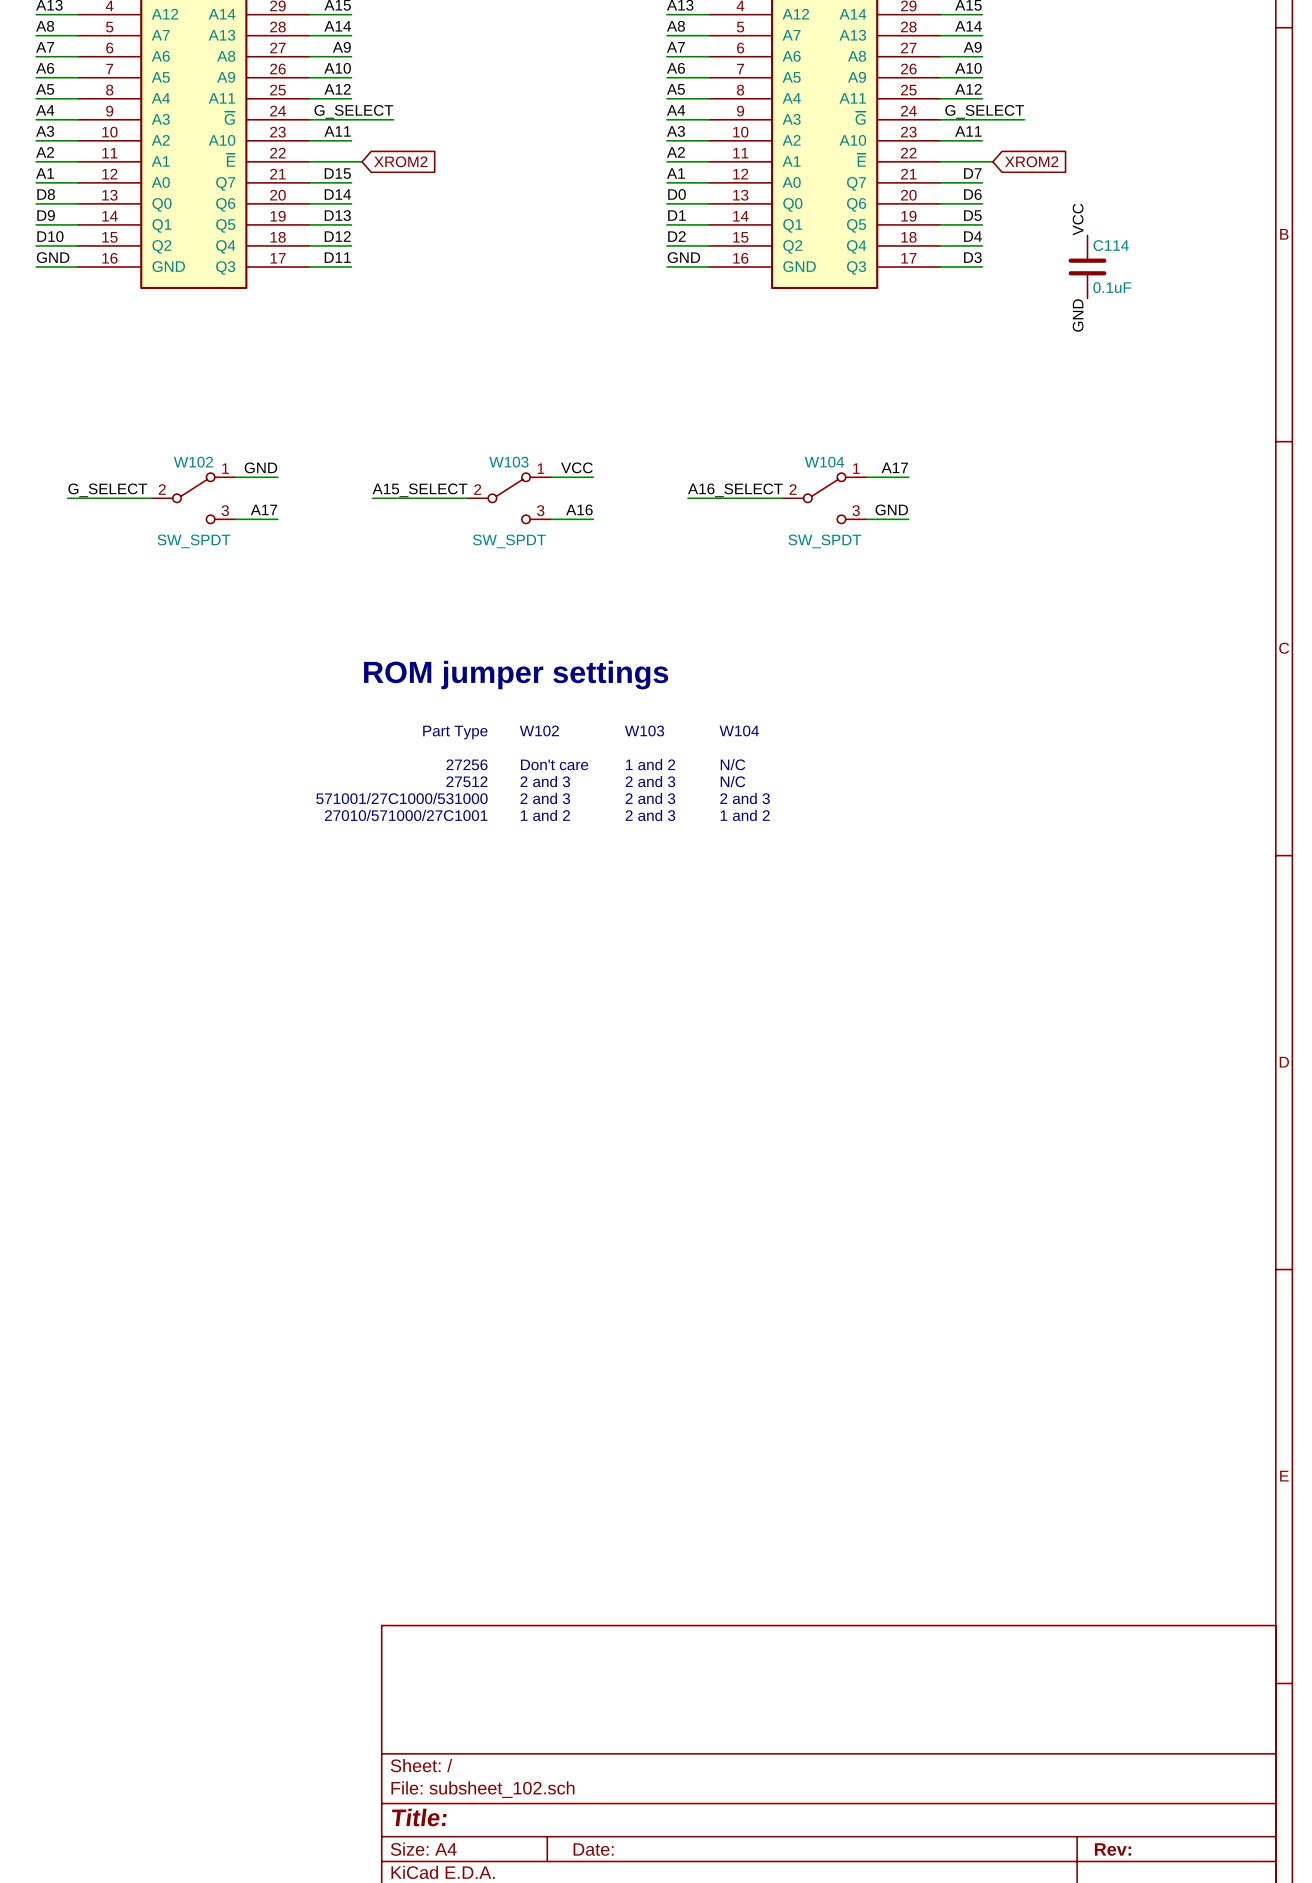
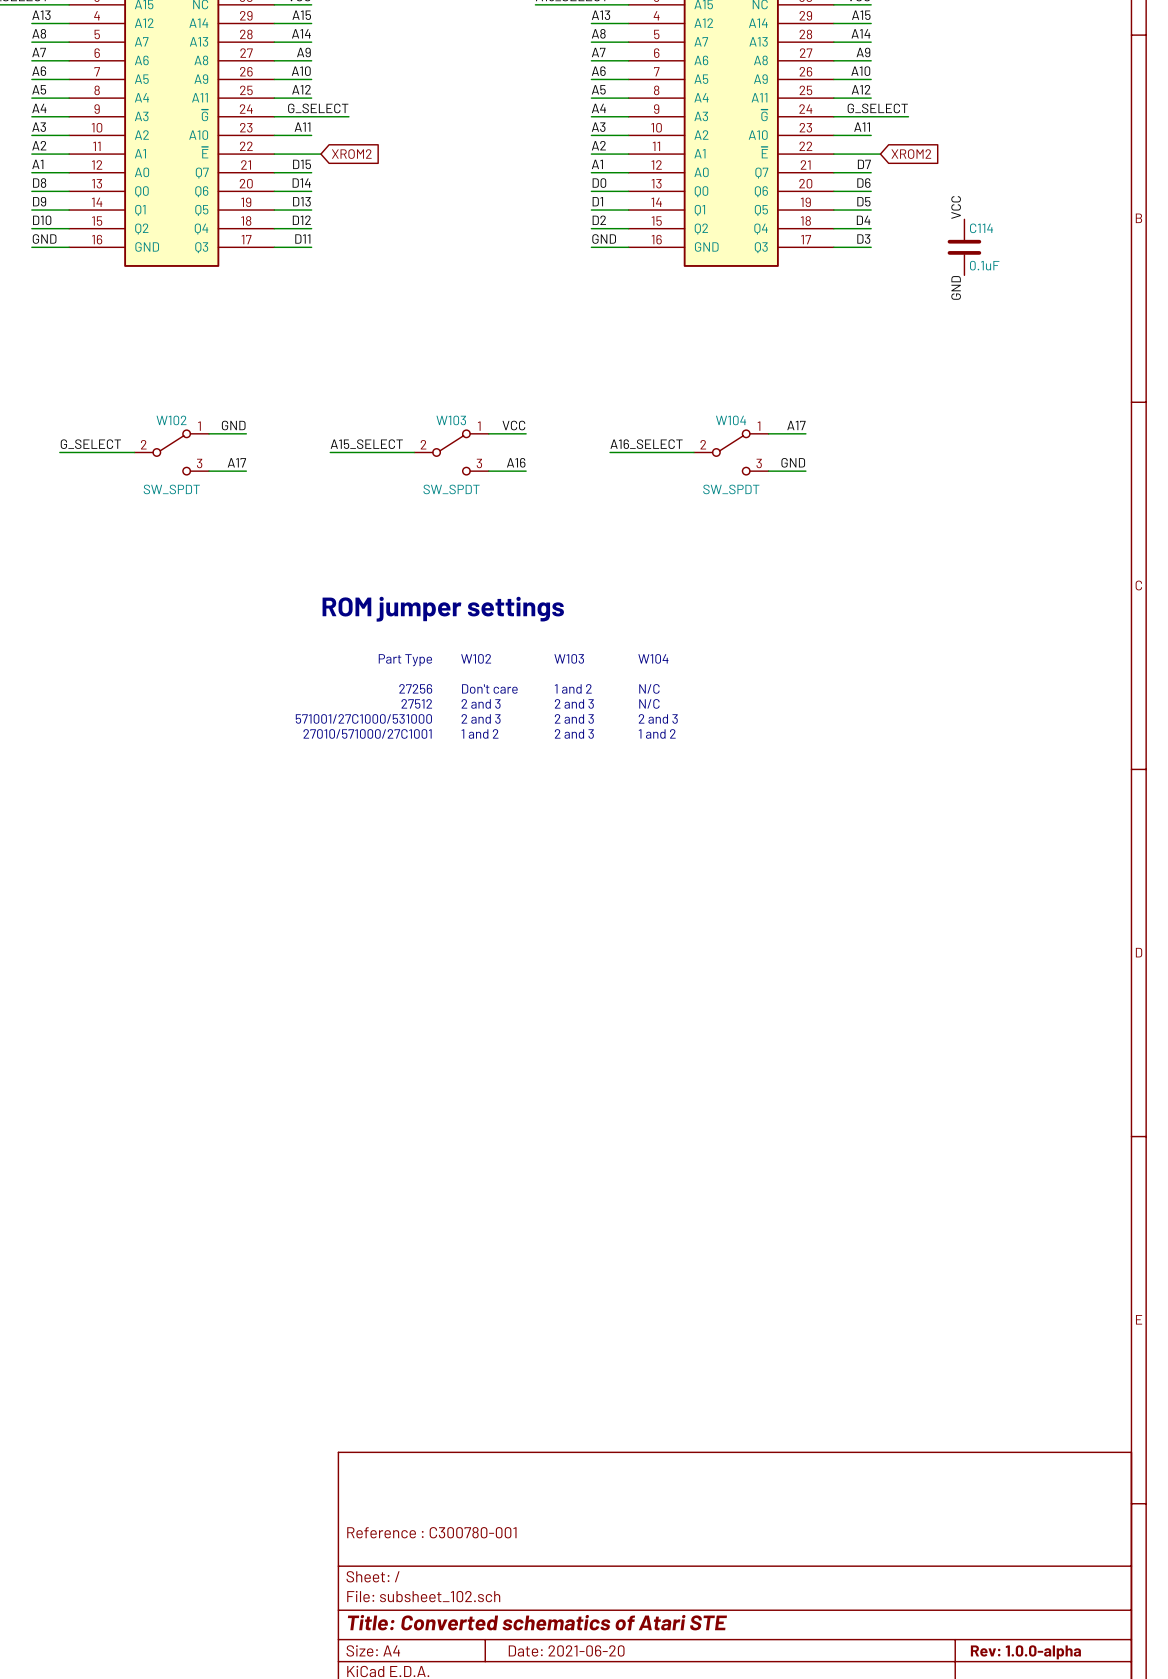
title block: none -> Reference : C300780-001 (431, 1532)
title block: Title: (419, 1817) -> Title: Converted schematics of Atari STE (537, 1622)
title block: Date: (593, 1849) -> Date: 2021-06-20 (566, 1650)
title block: Rev: (1112, 1849) -> Rev: 1.0.0-alpha (1025, 1652)

